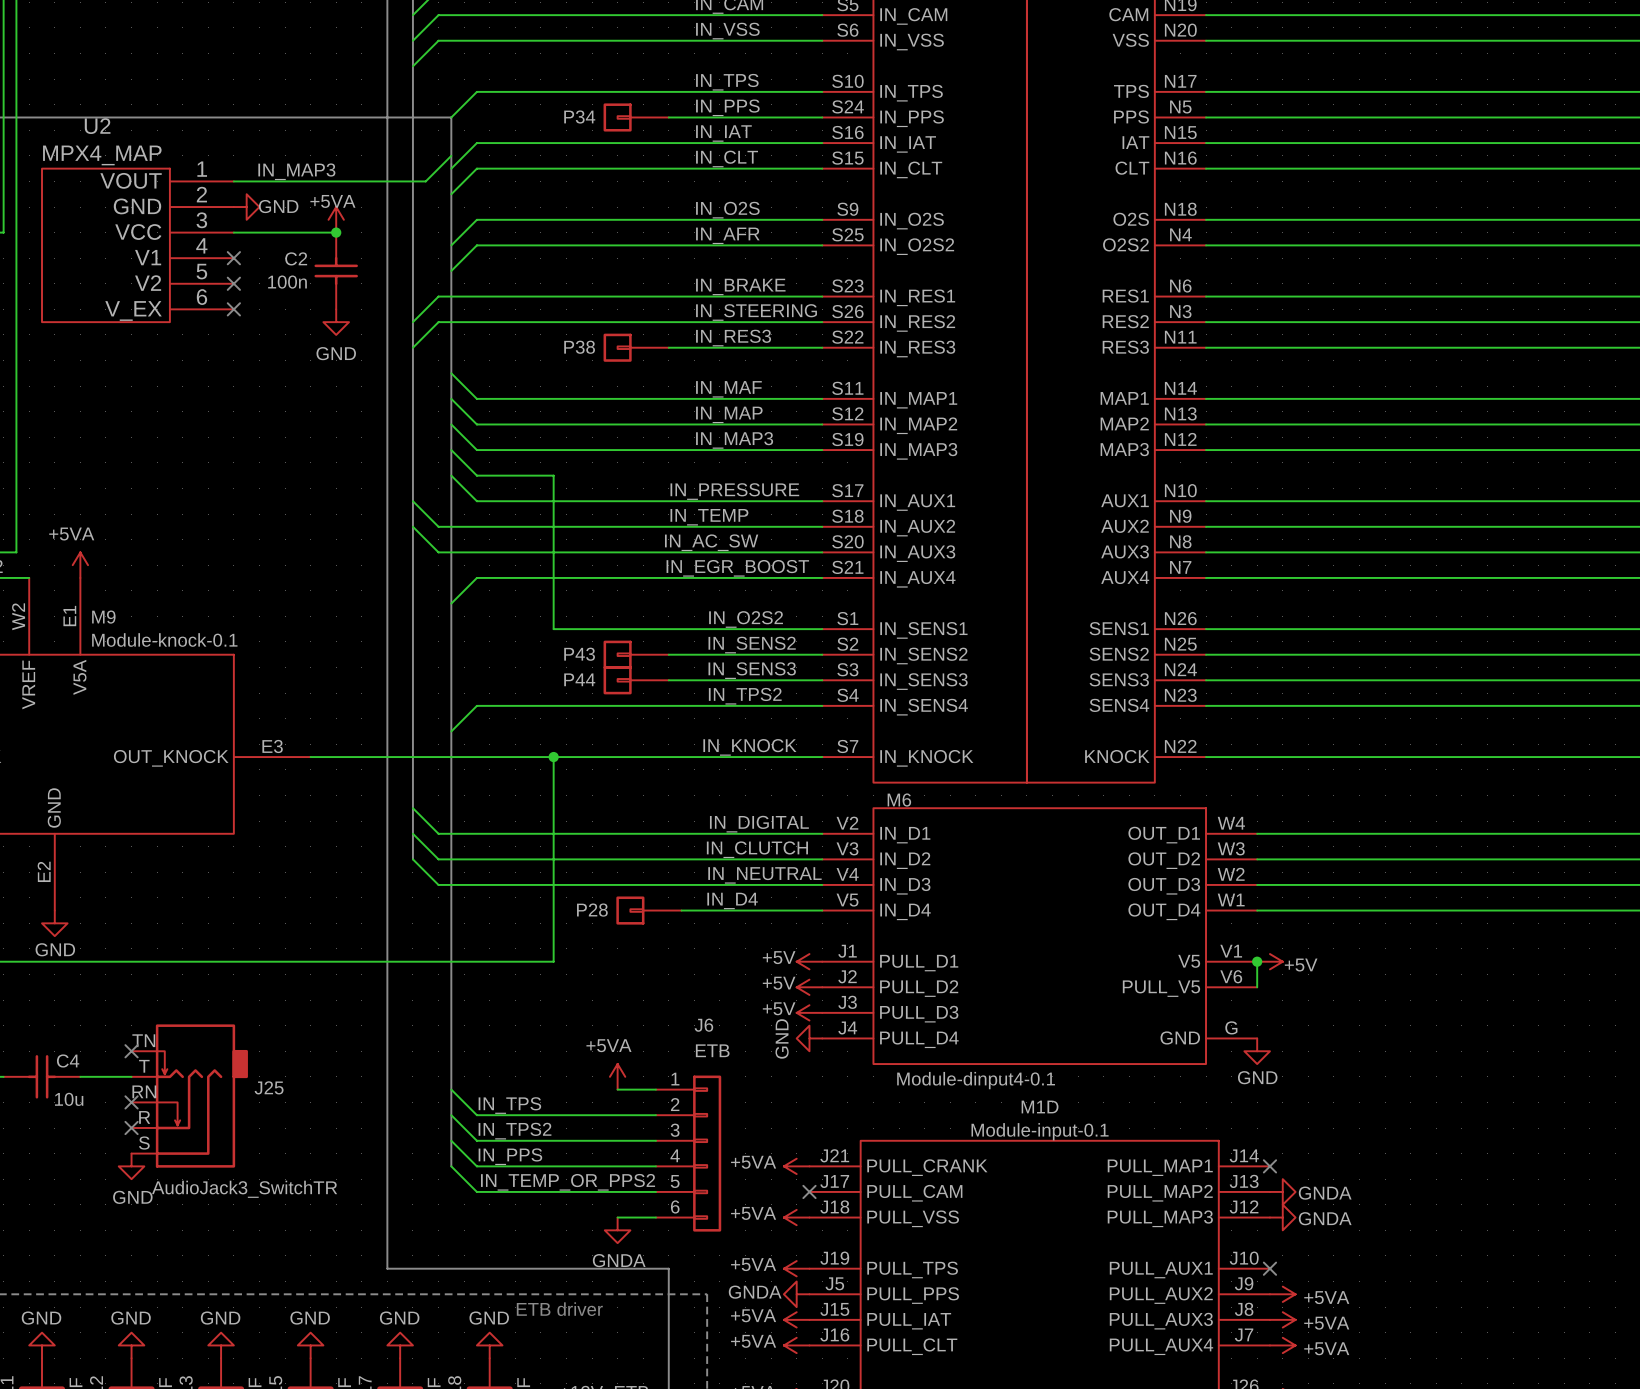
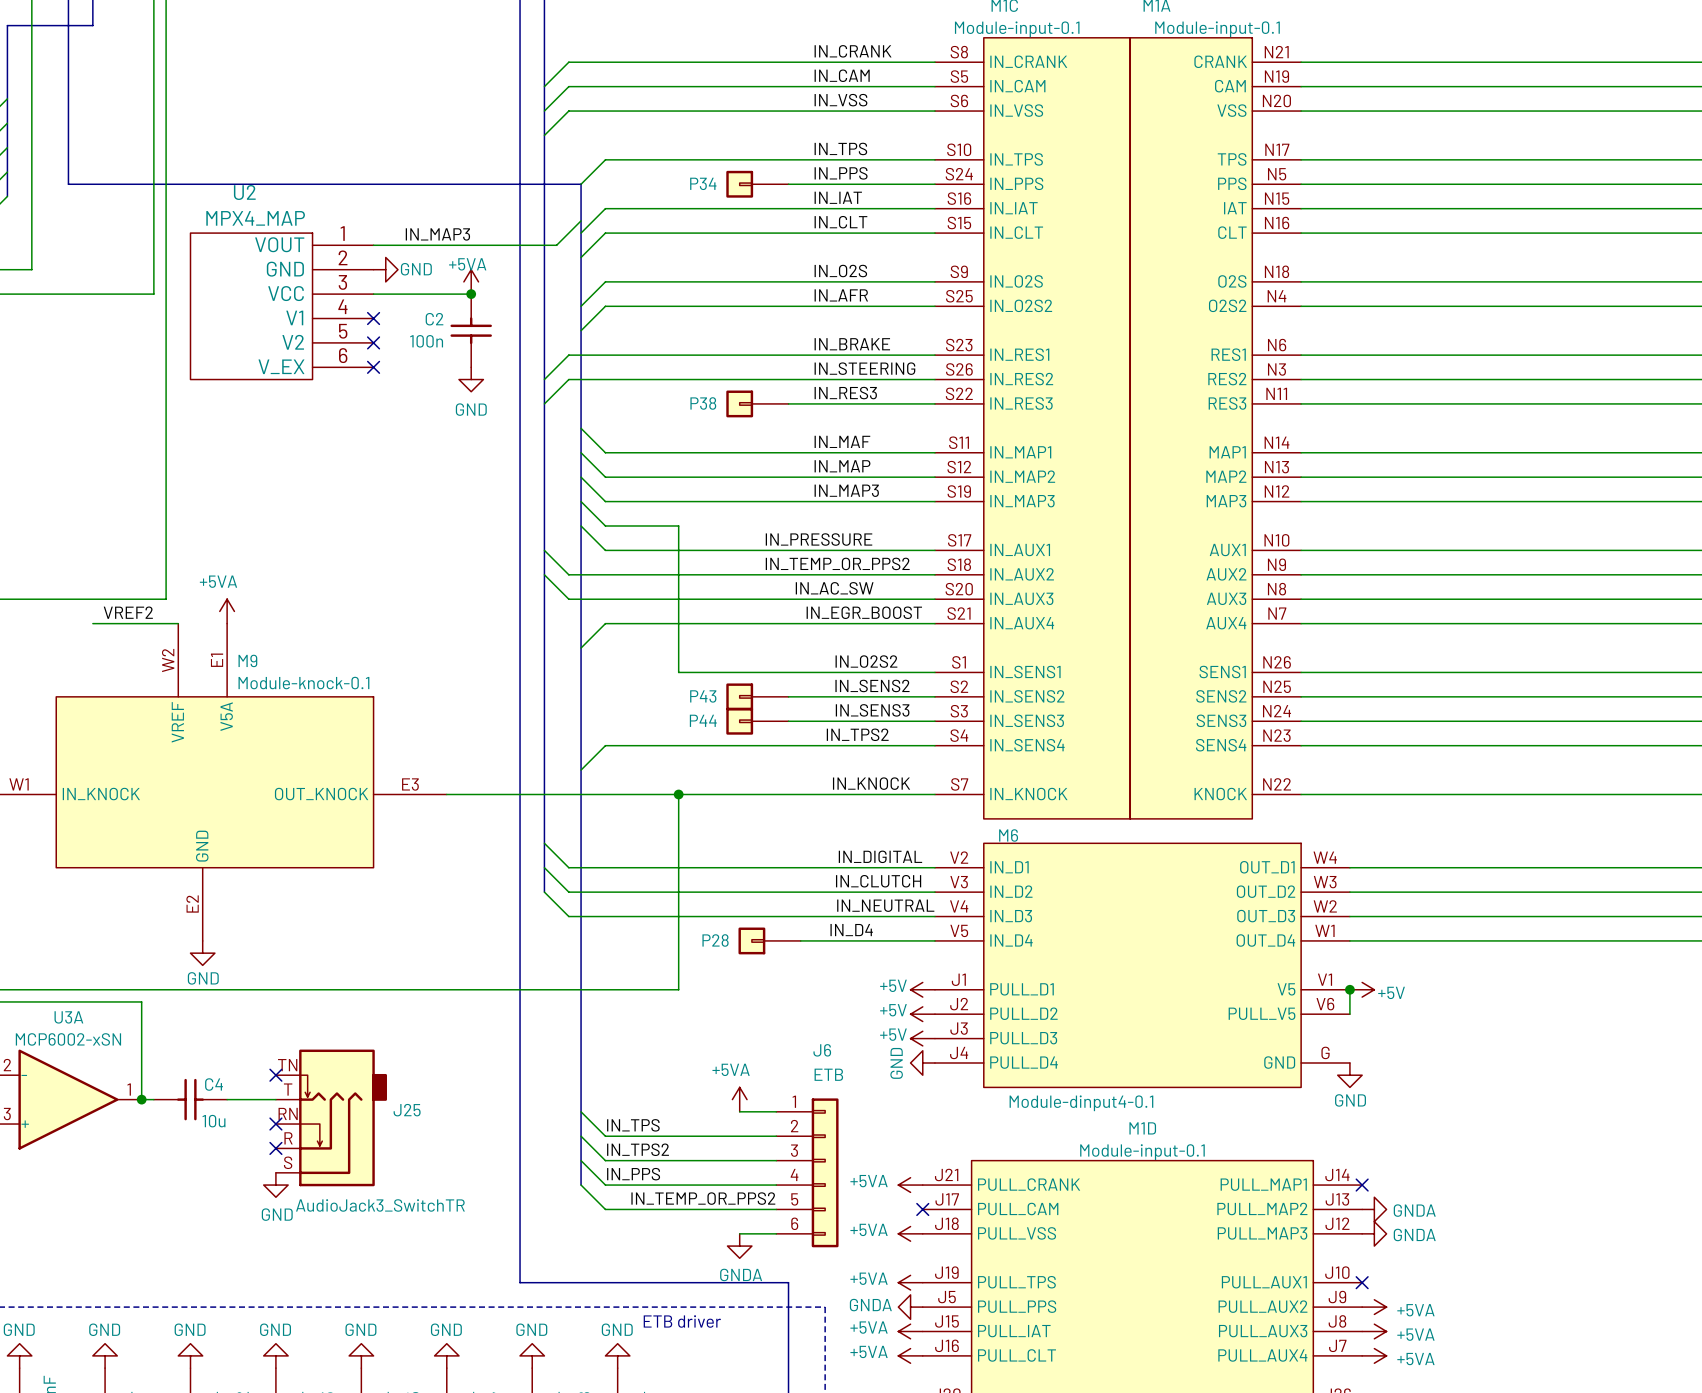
label position: IN_PRESSURE (734, 491) -> IN_PRESSURE (819, 539)
label: IN_TEMP (709, 517) -> IN_TEMP_OR_PPS2 (837, 563)

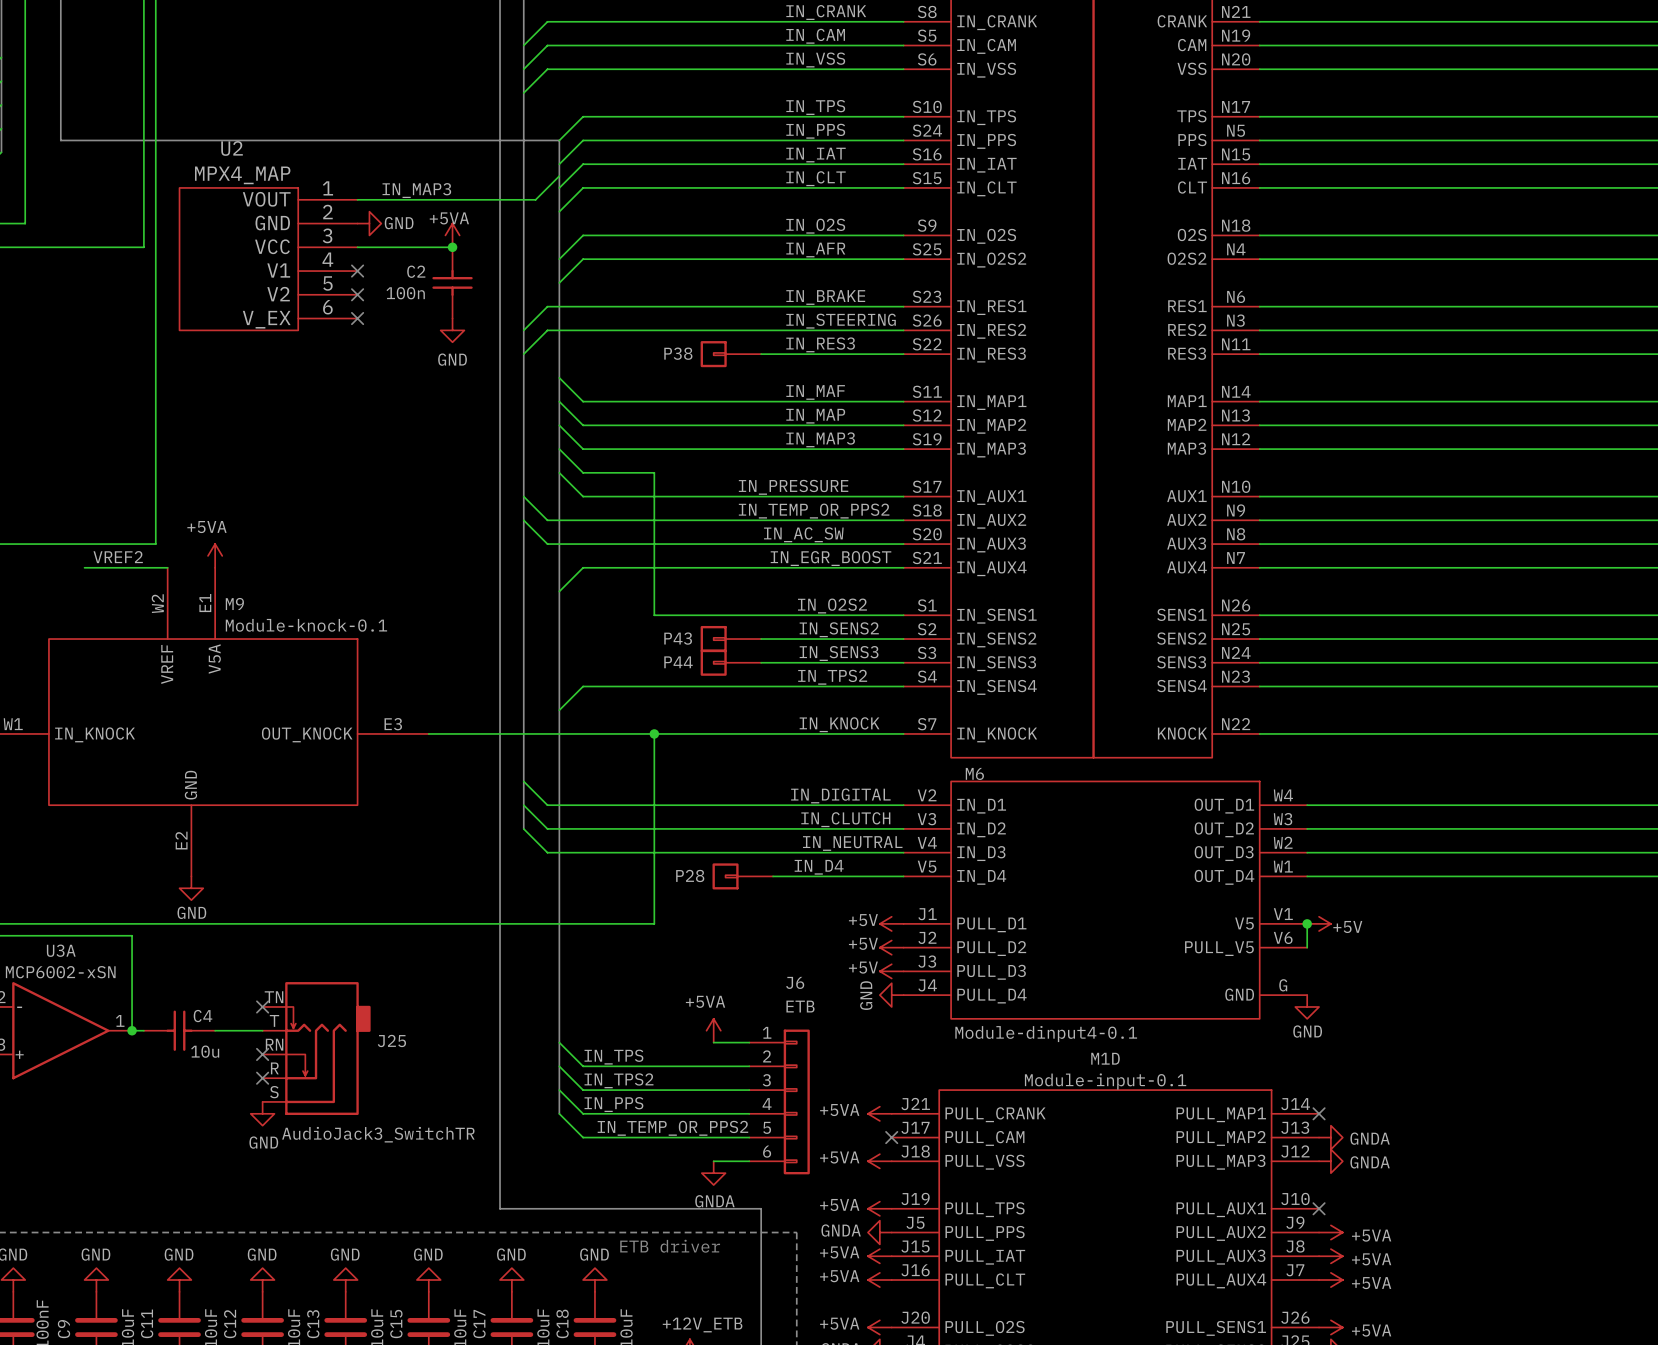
P34: (757, 184) -> none
wire: none -> (761, 140) (583, 140) (559, 164)

